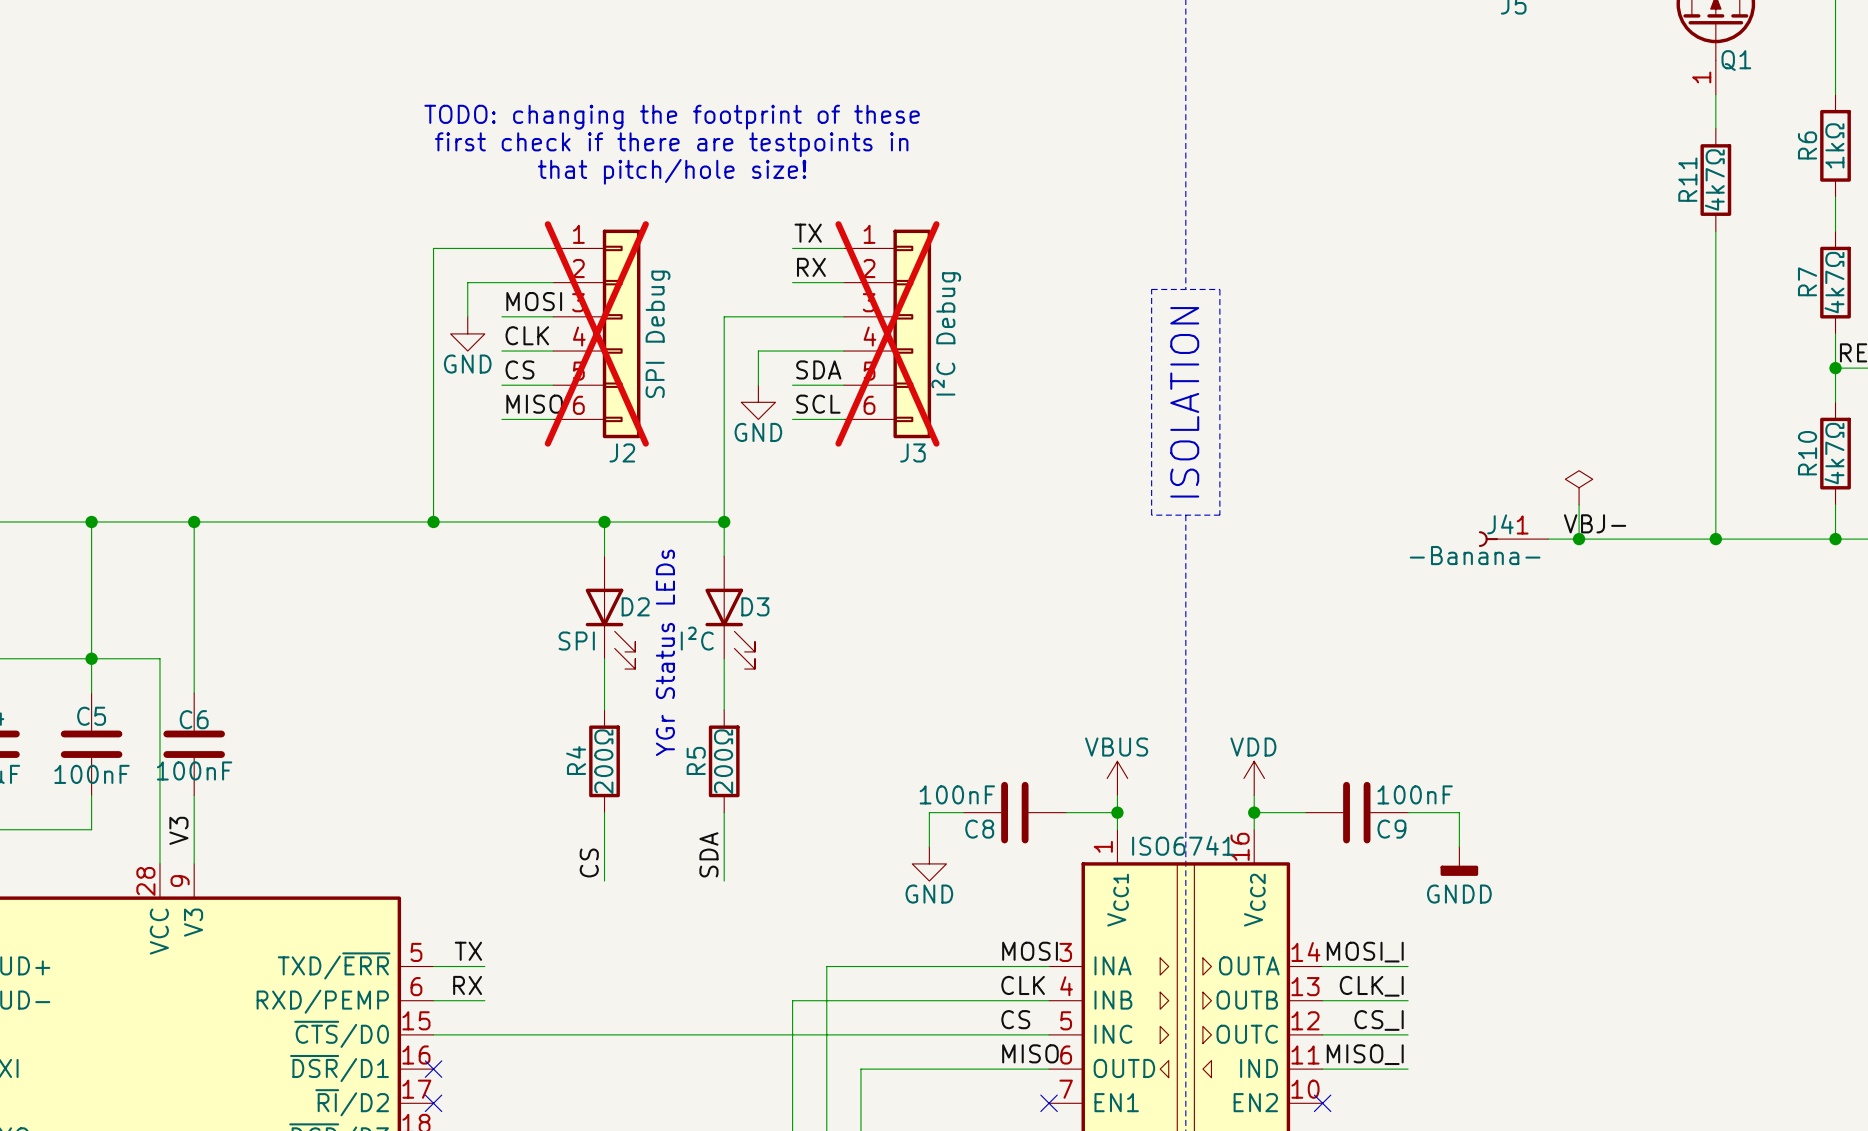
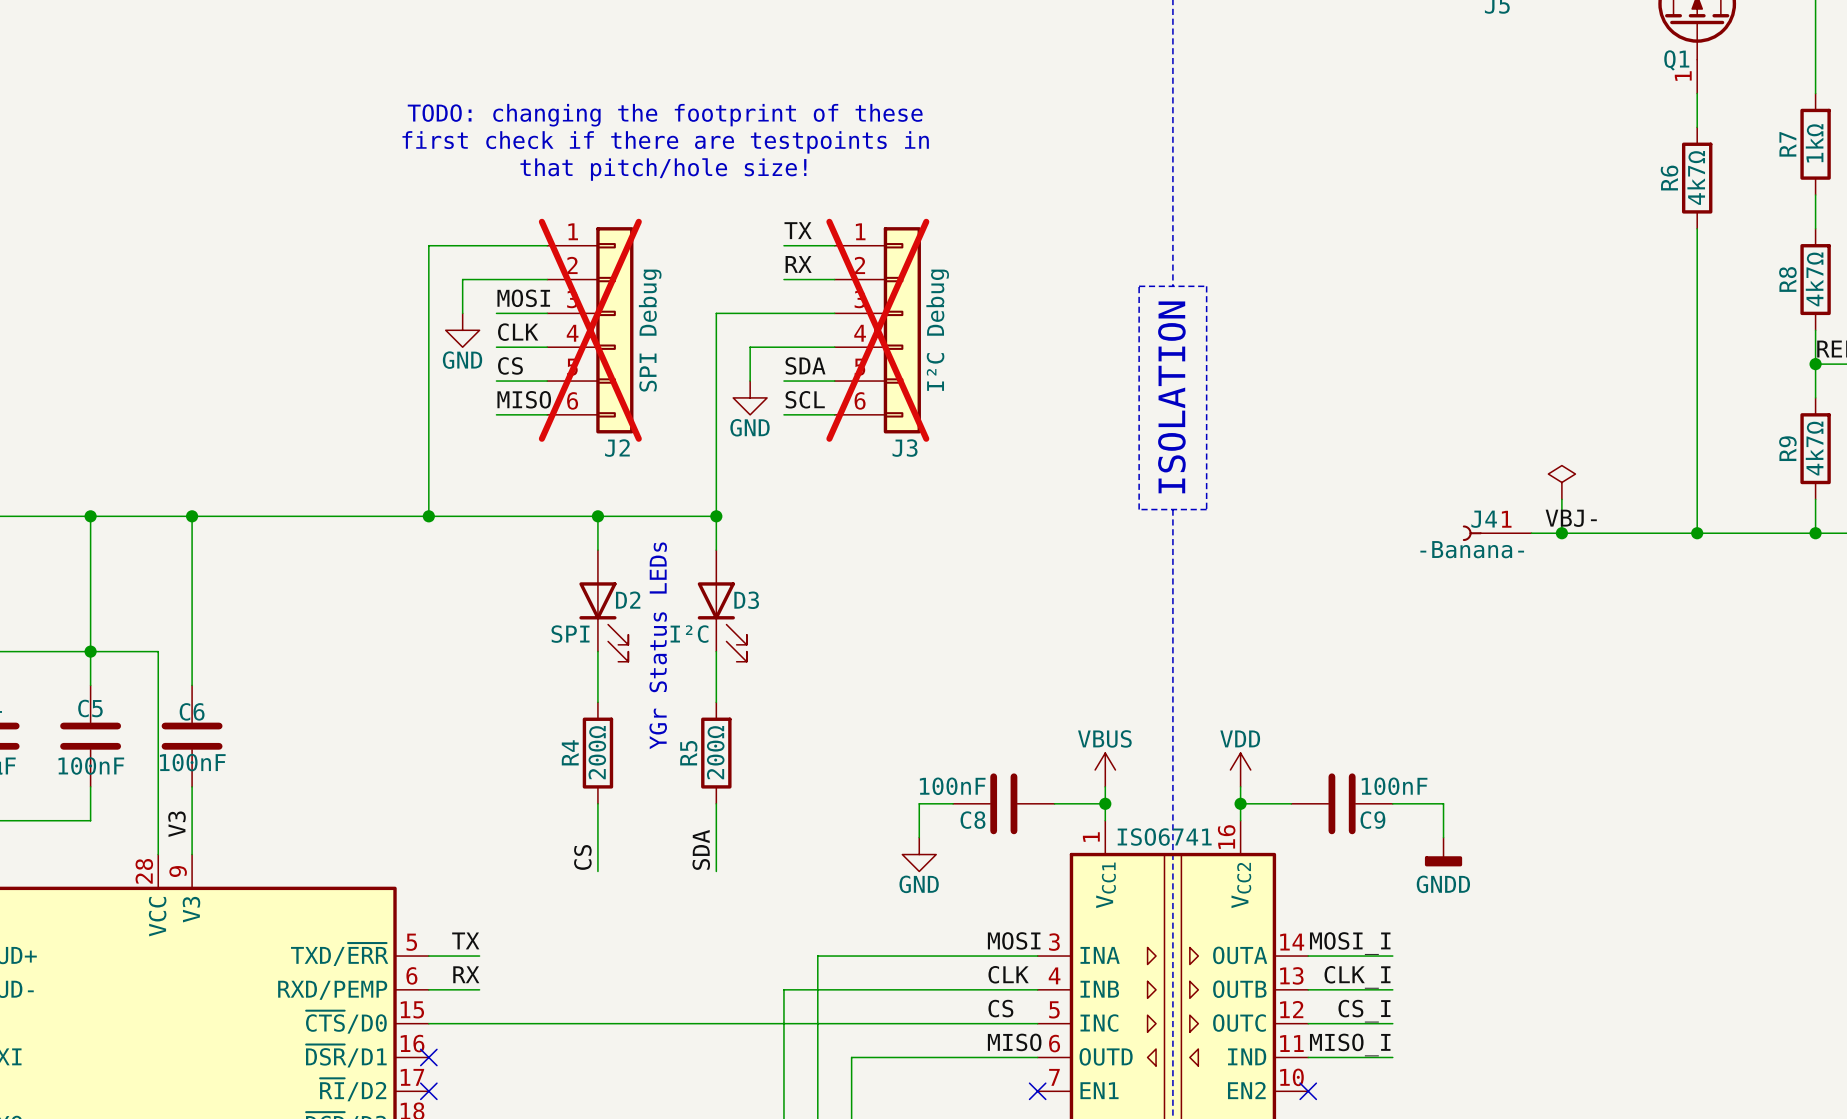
Q1 name position: Q1 (1736, 60) -> Q1 (1676, 60)
R6 name: R6 (1807, 145) -> R7 (1787, 144)
R11 name: R11 (1687, 179) -> R6 (1669, 178)
R7 name: R7 (1807, 281) -> R8 (1787, 279)
R10 name: R10 (1807, 453) -> R9 (1787, 448)

